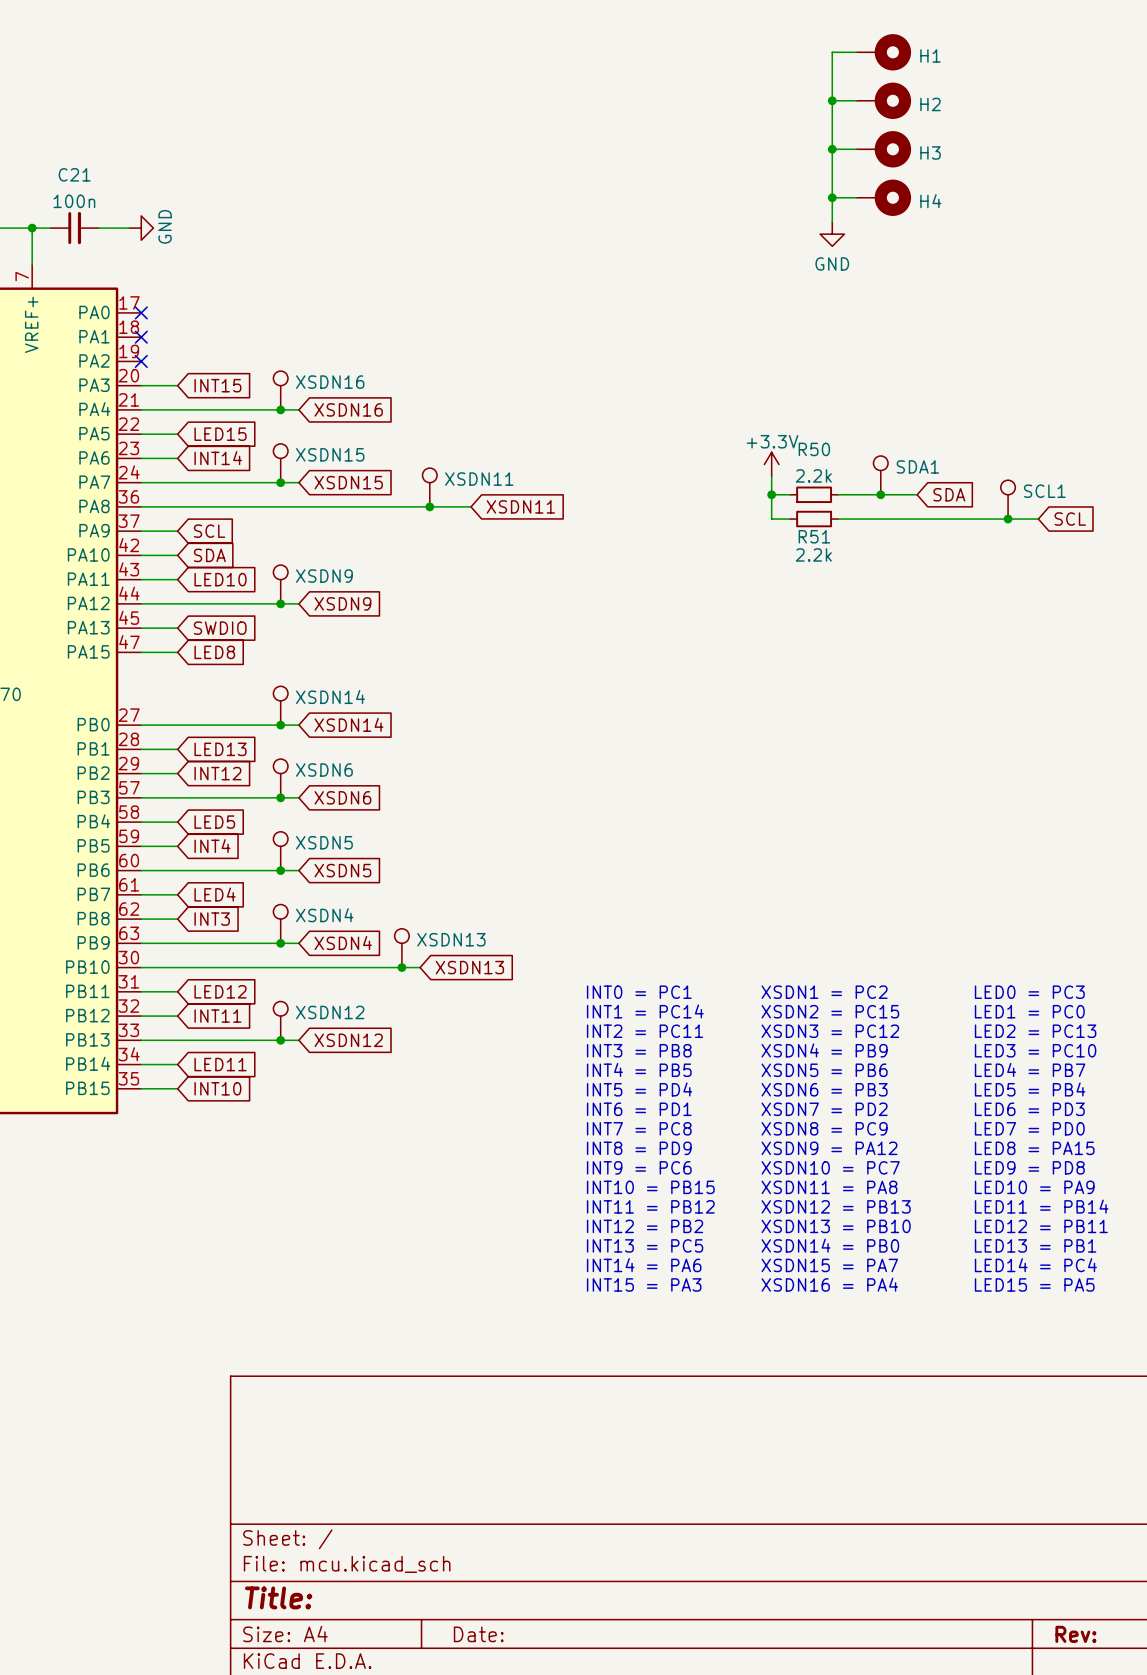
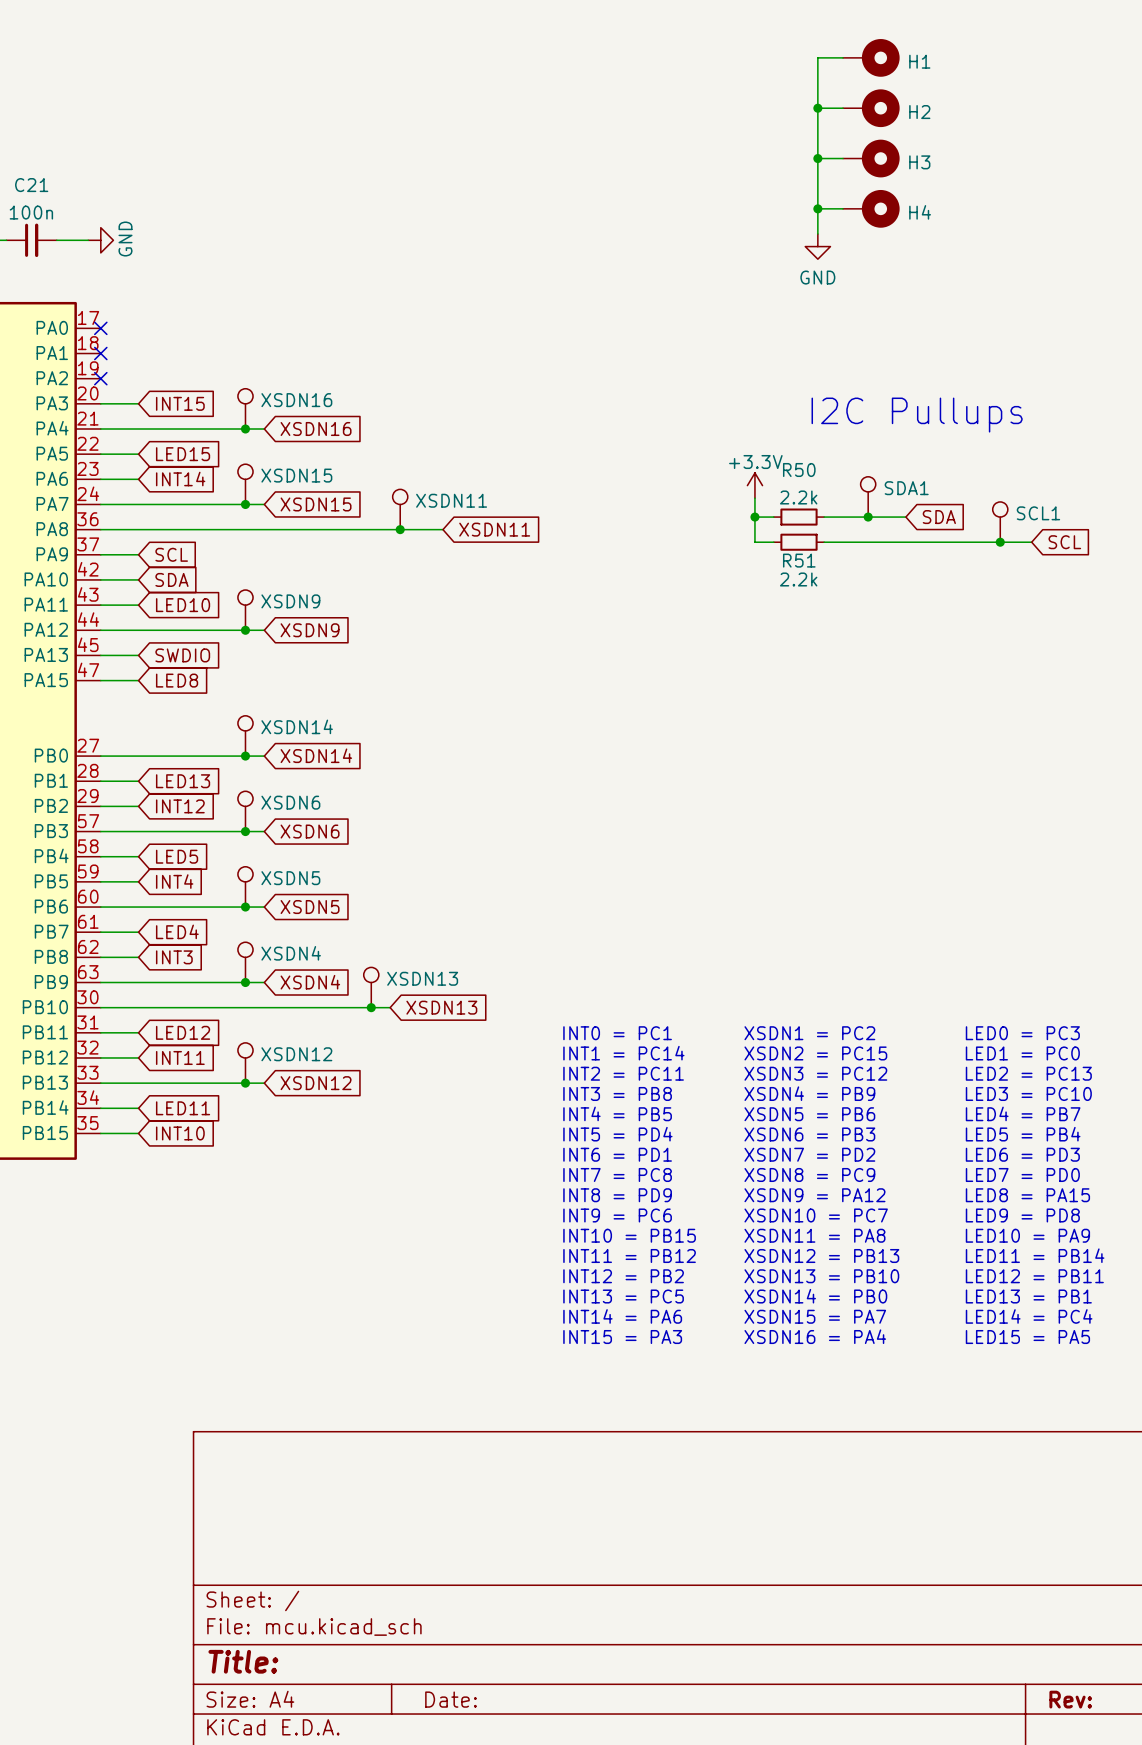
text: none -> I2C Pullups (917, 415)

